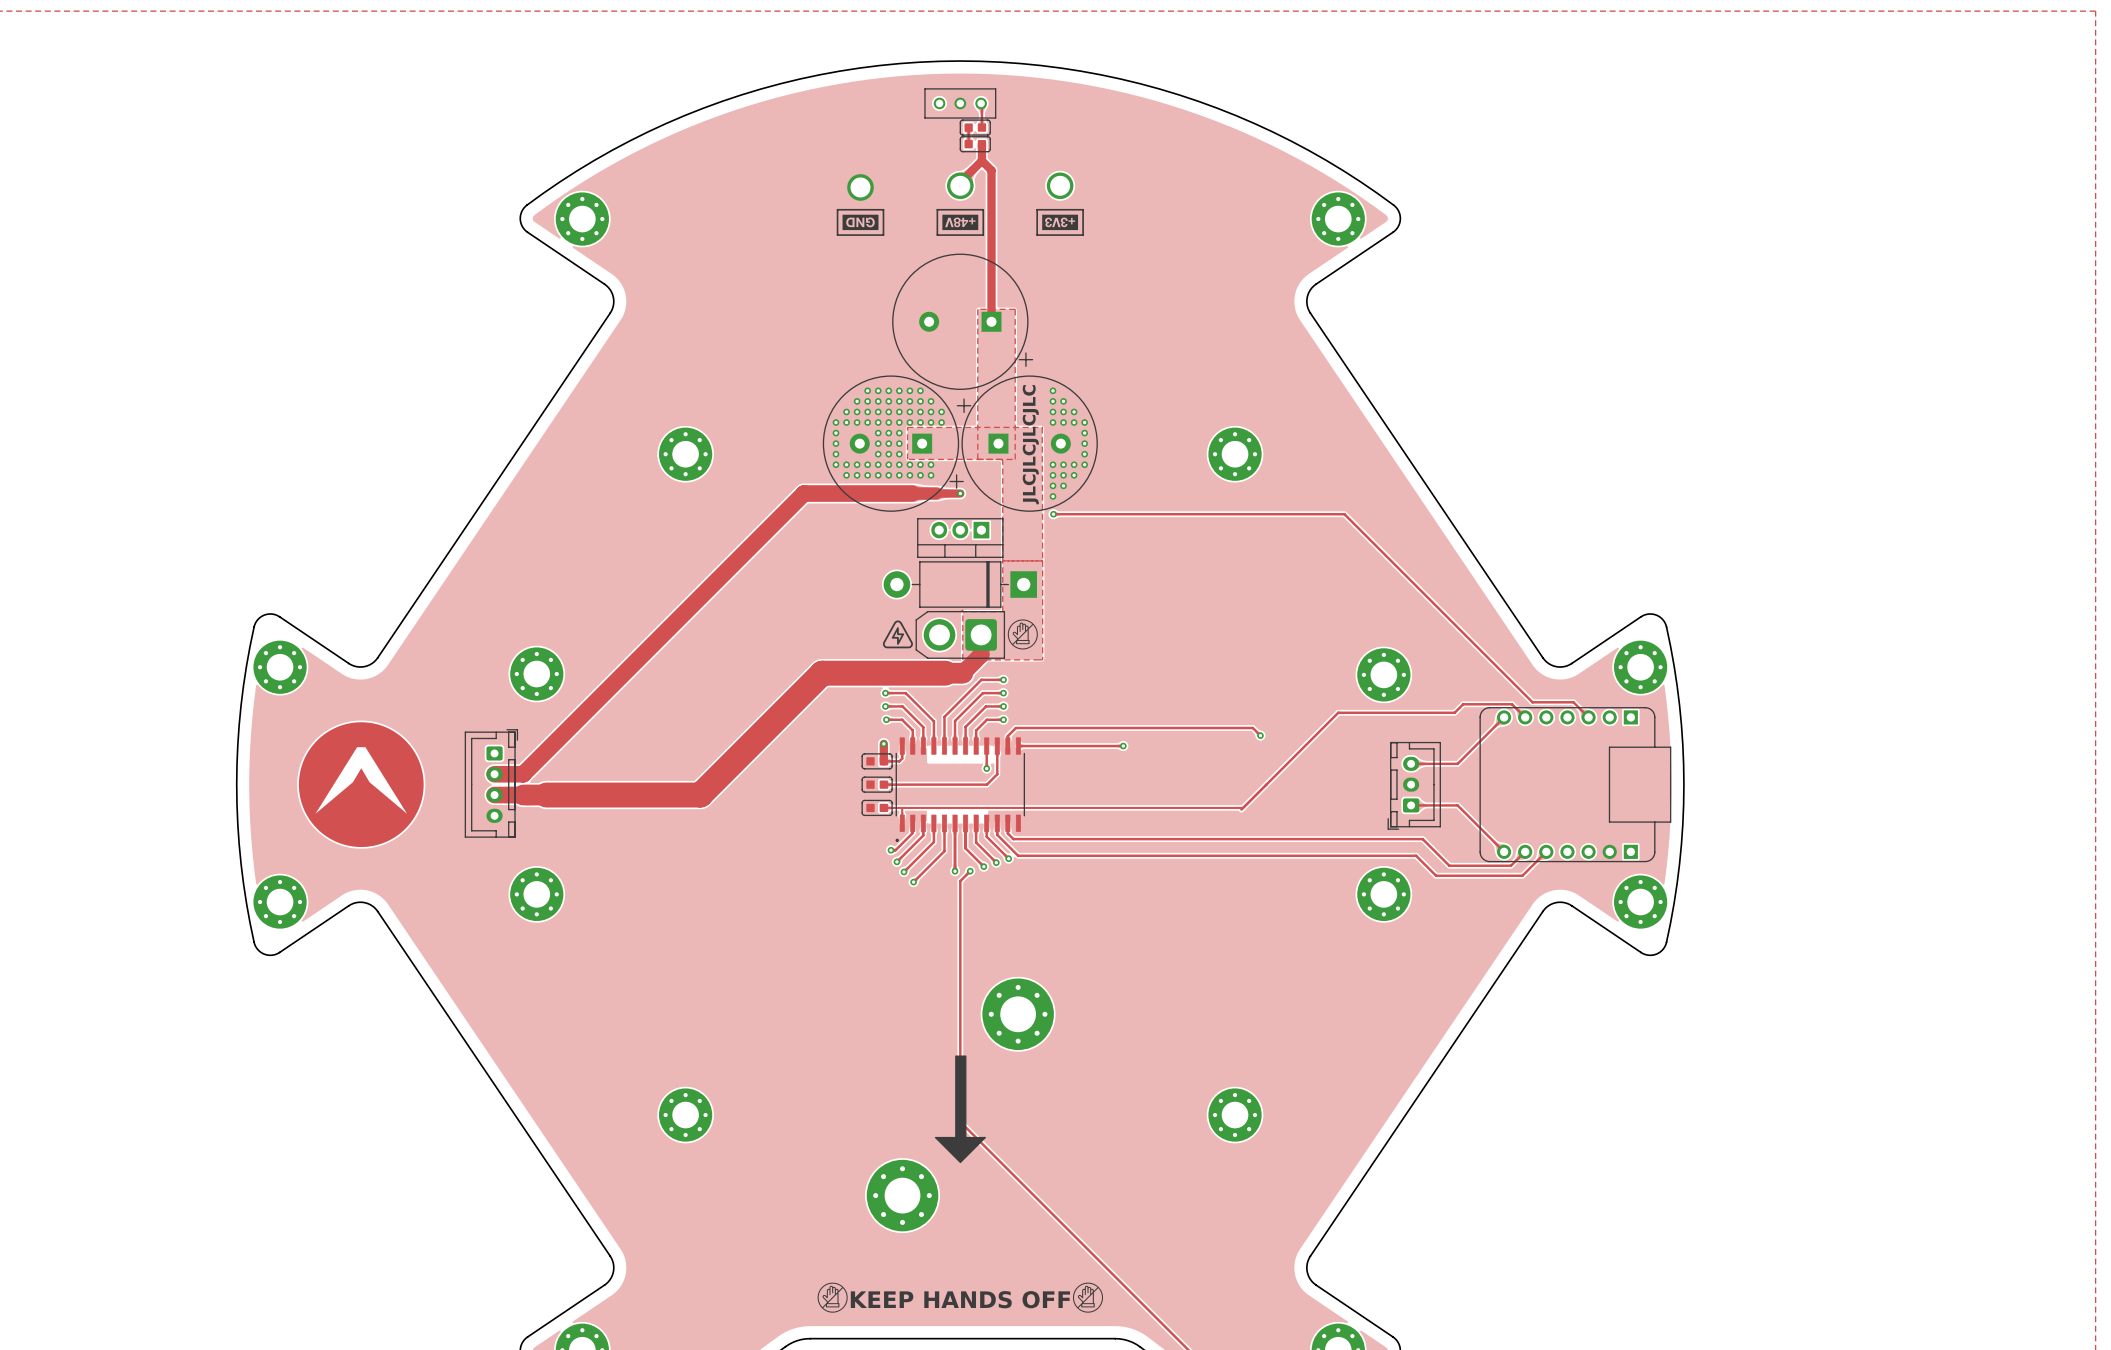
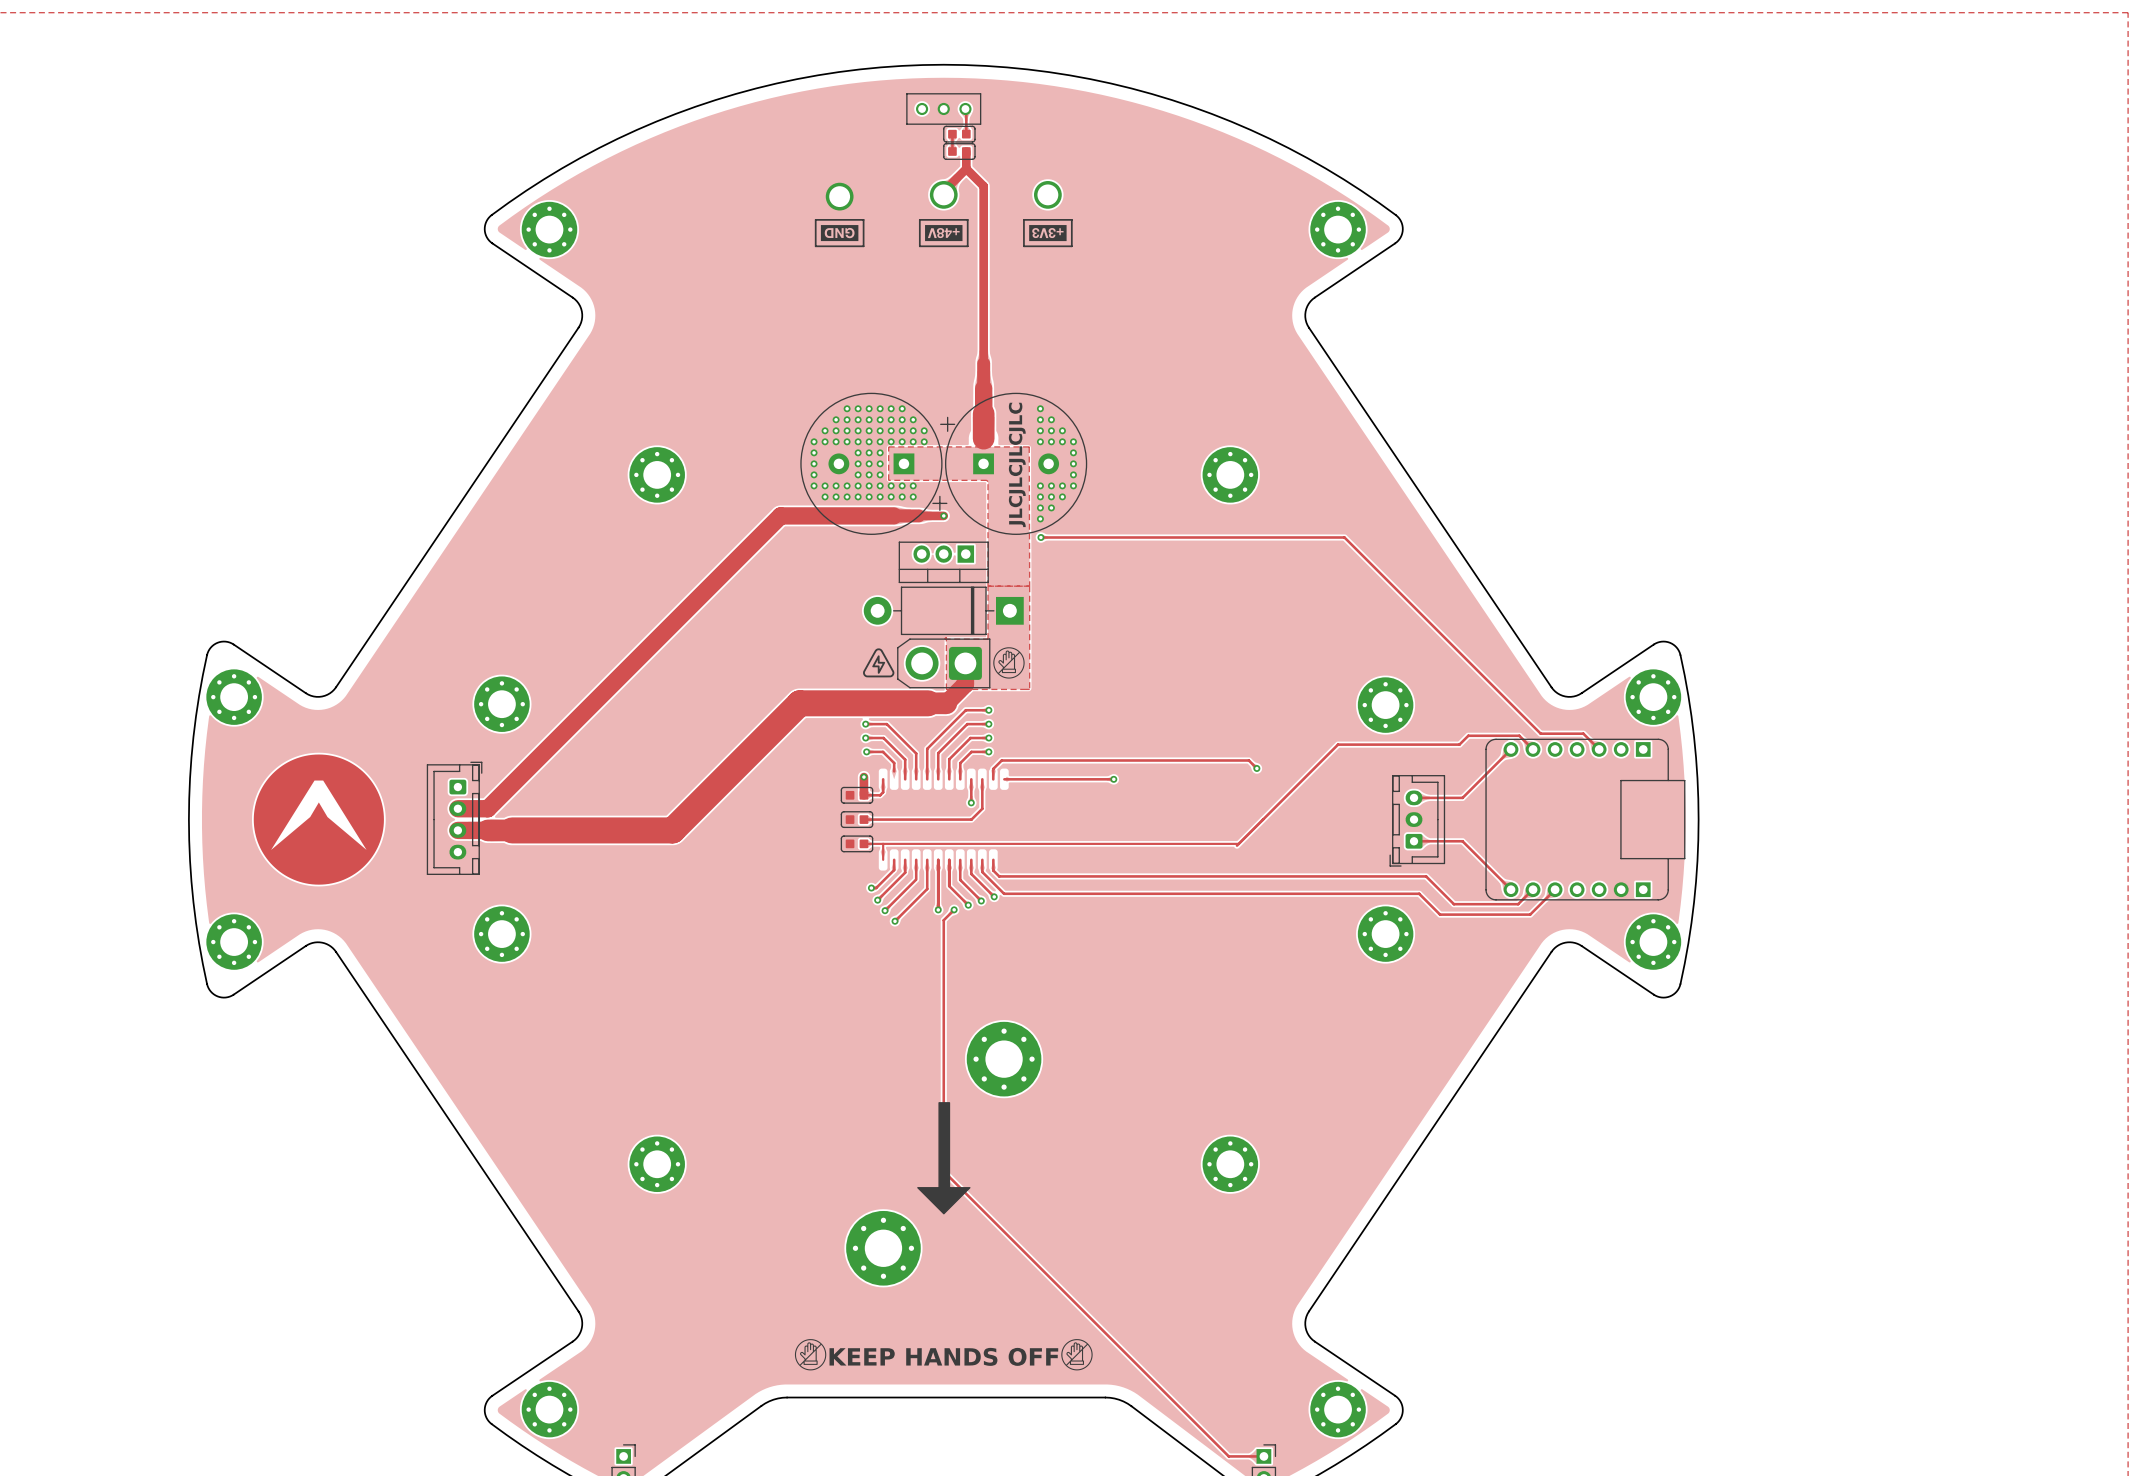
track: (991, 170) (991, 321) -> (976, 178) (983, 186) (983, 438)
part: (962, 321) -> none
zone outline: (977, 459) (977, 309) (1015, 309) (1015, 459) (1001, 459) -> none
part: (960, 789) -> none

